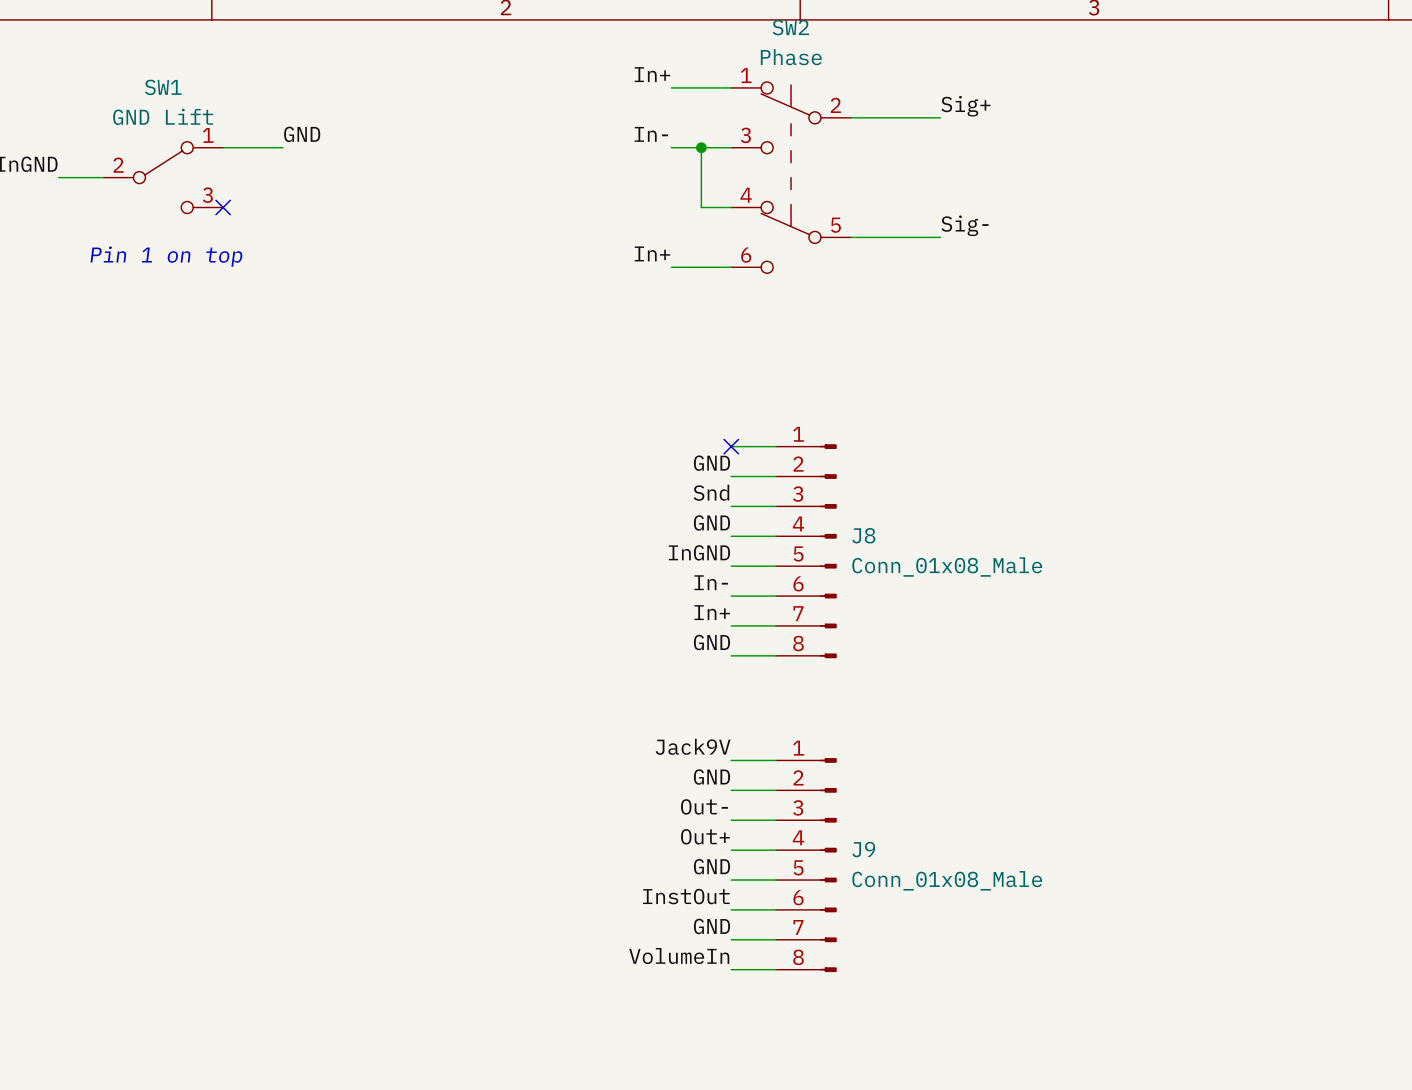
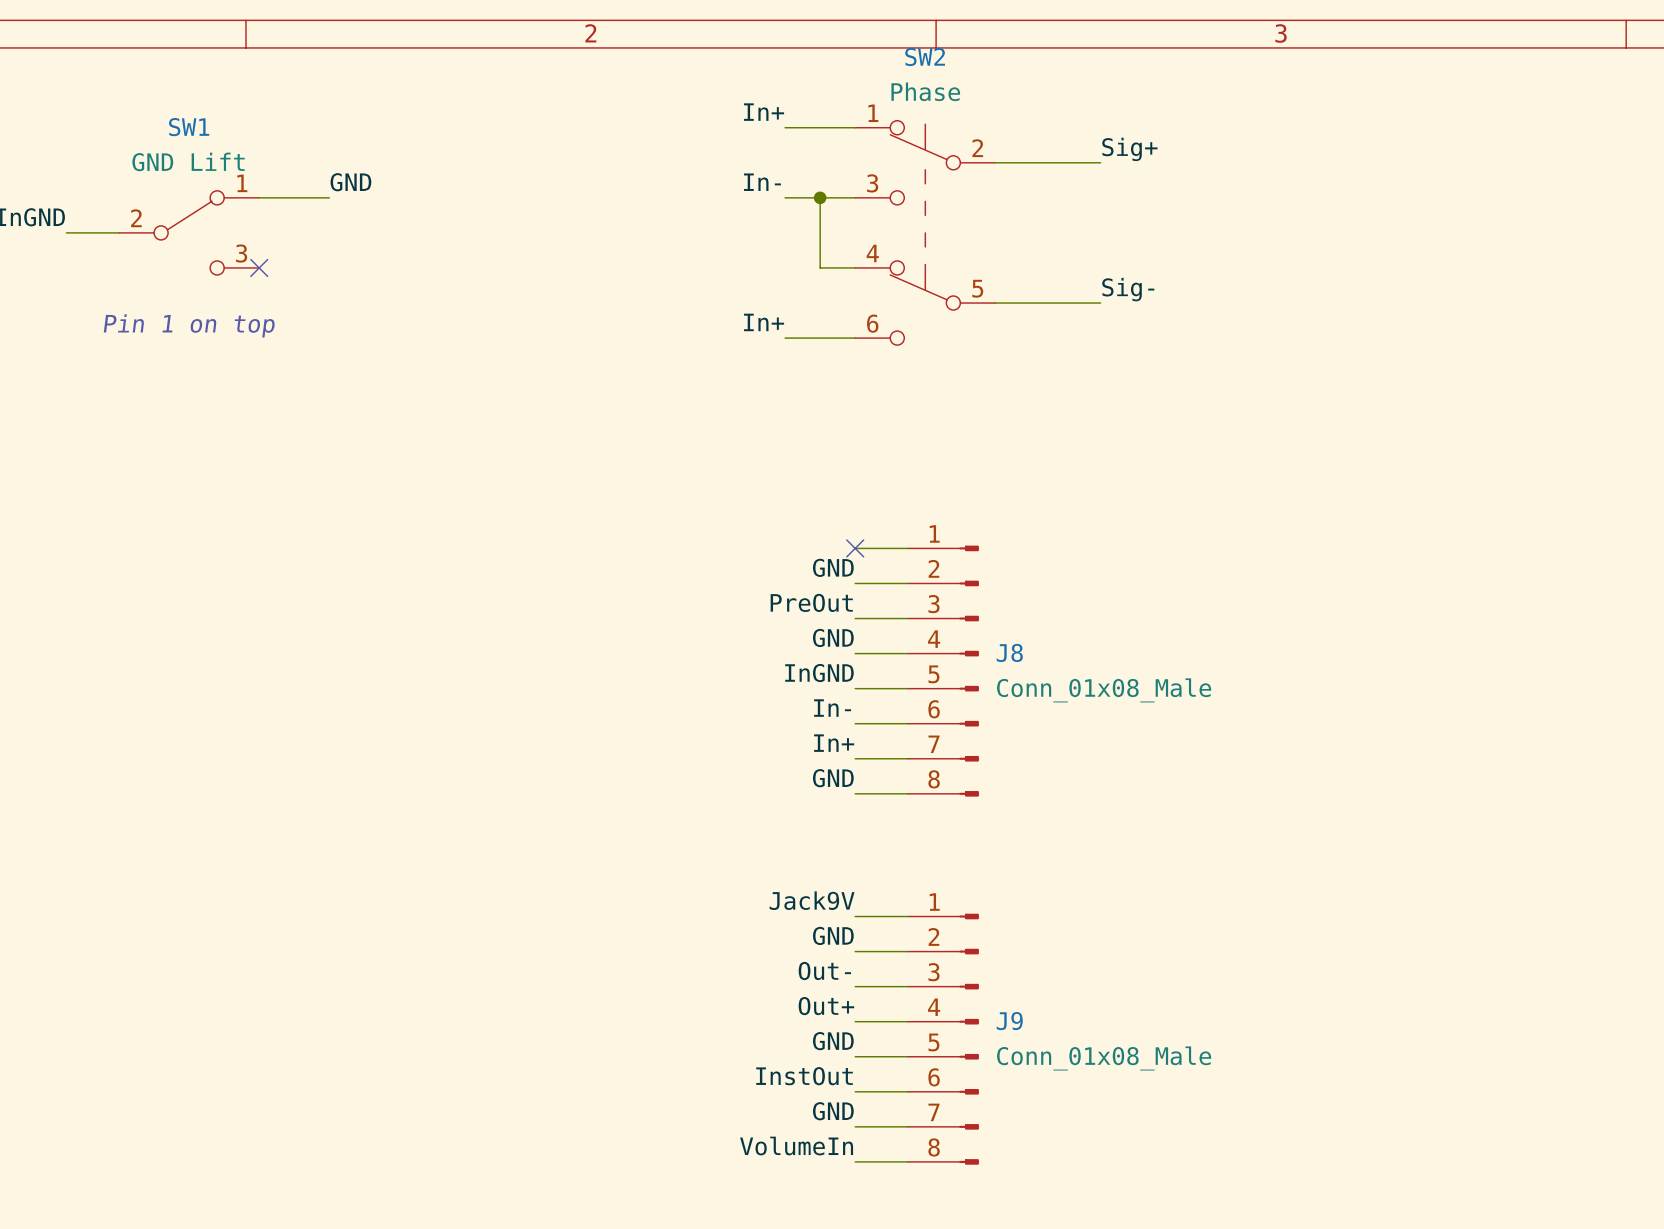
label: Snd (711, 492) -> PreOut (811, 602)

